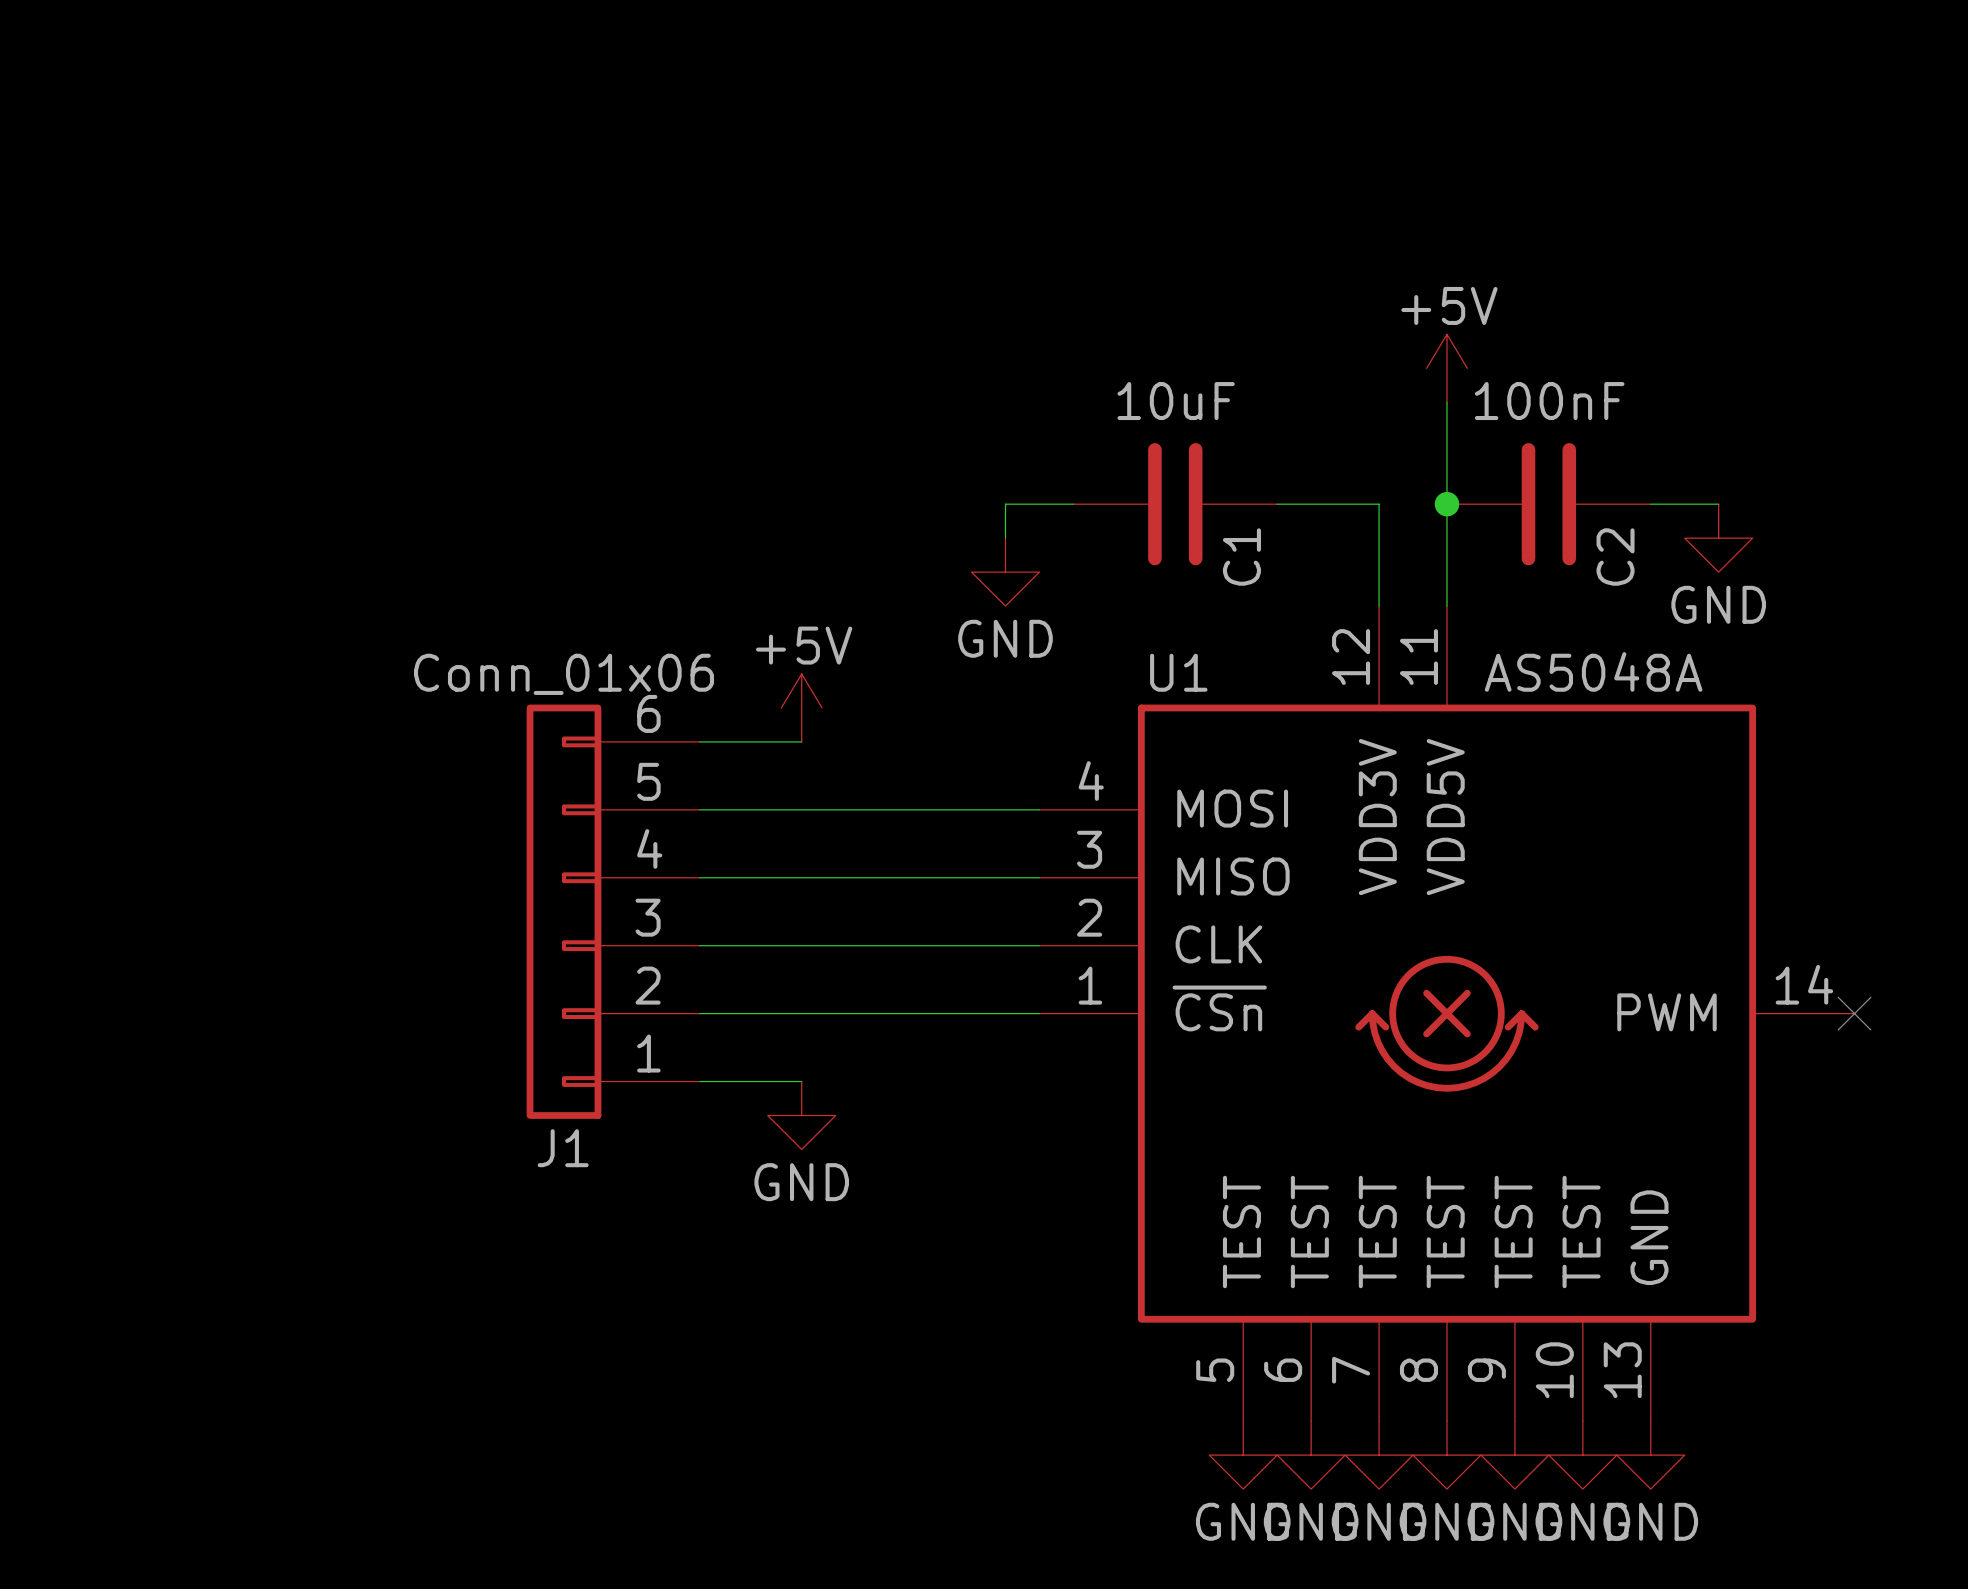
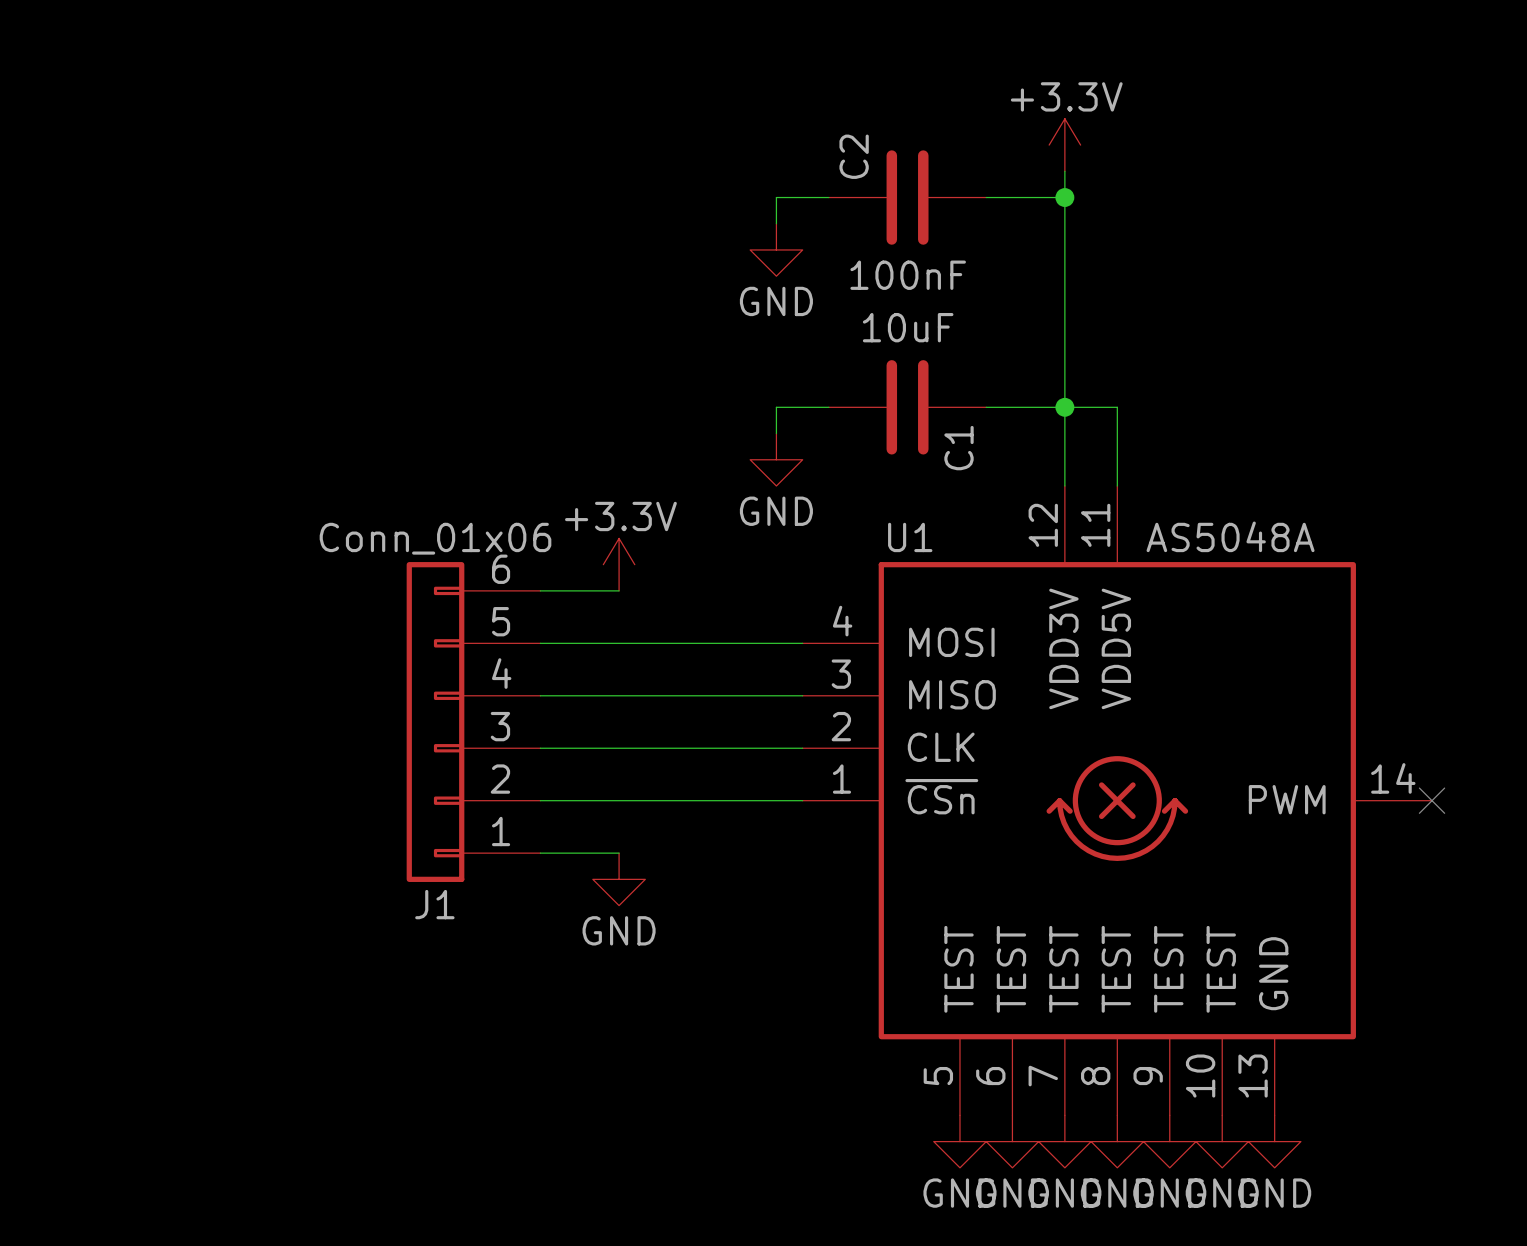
power symbol: none -> +3.3V (1064, 145)
wire: none -> (828, 197) (776, 197) (776, 223)
wire: none -> (986, 197) (1064, 197)
junction: none -> (1064, 197)
power symbol: none -> GND (776, 249)
power symbol: +5V (1446, 368) -> none
C2 value position: 100nF (1549, 401) -> 100nF (908, 275)
wire: (1446, 402) (1446, 504) -> (1064, 171) (1064, 407) (1117, 407)
junction position: (1446, 504) -> (1064, 407)
C2 position: (1548, 504) -> (907, 197)
wire: (1650, 504) (1718, 504) -> none
power symbol: GND (1718, 538) -> none
C2 name position: C2 (1615, 557) -> C2 (854, 156)
power symbol: +5V (801, 707) -> +3.3V (619, 564)

